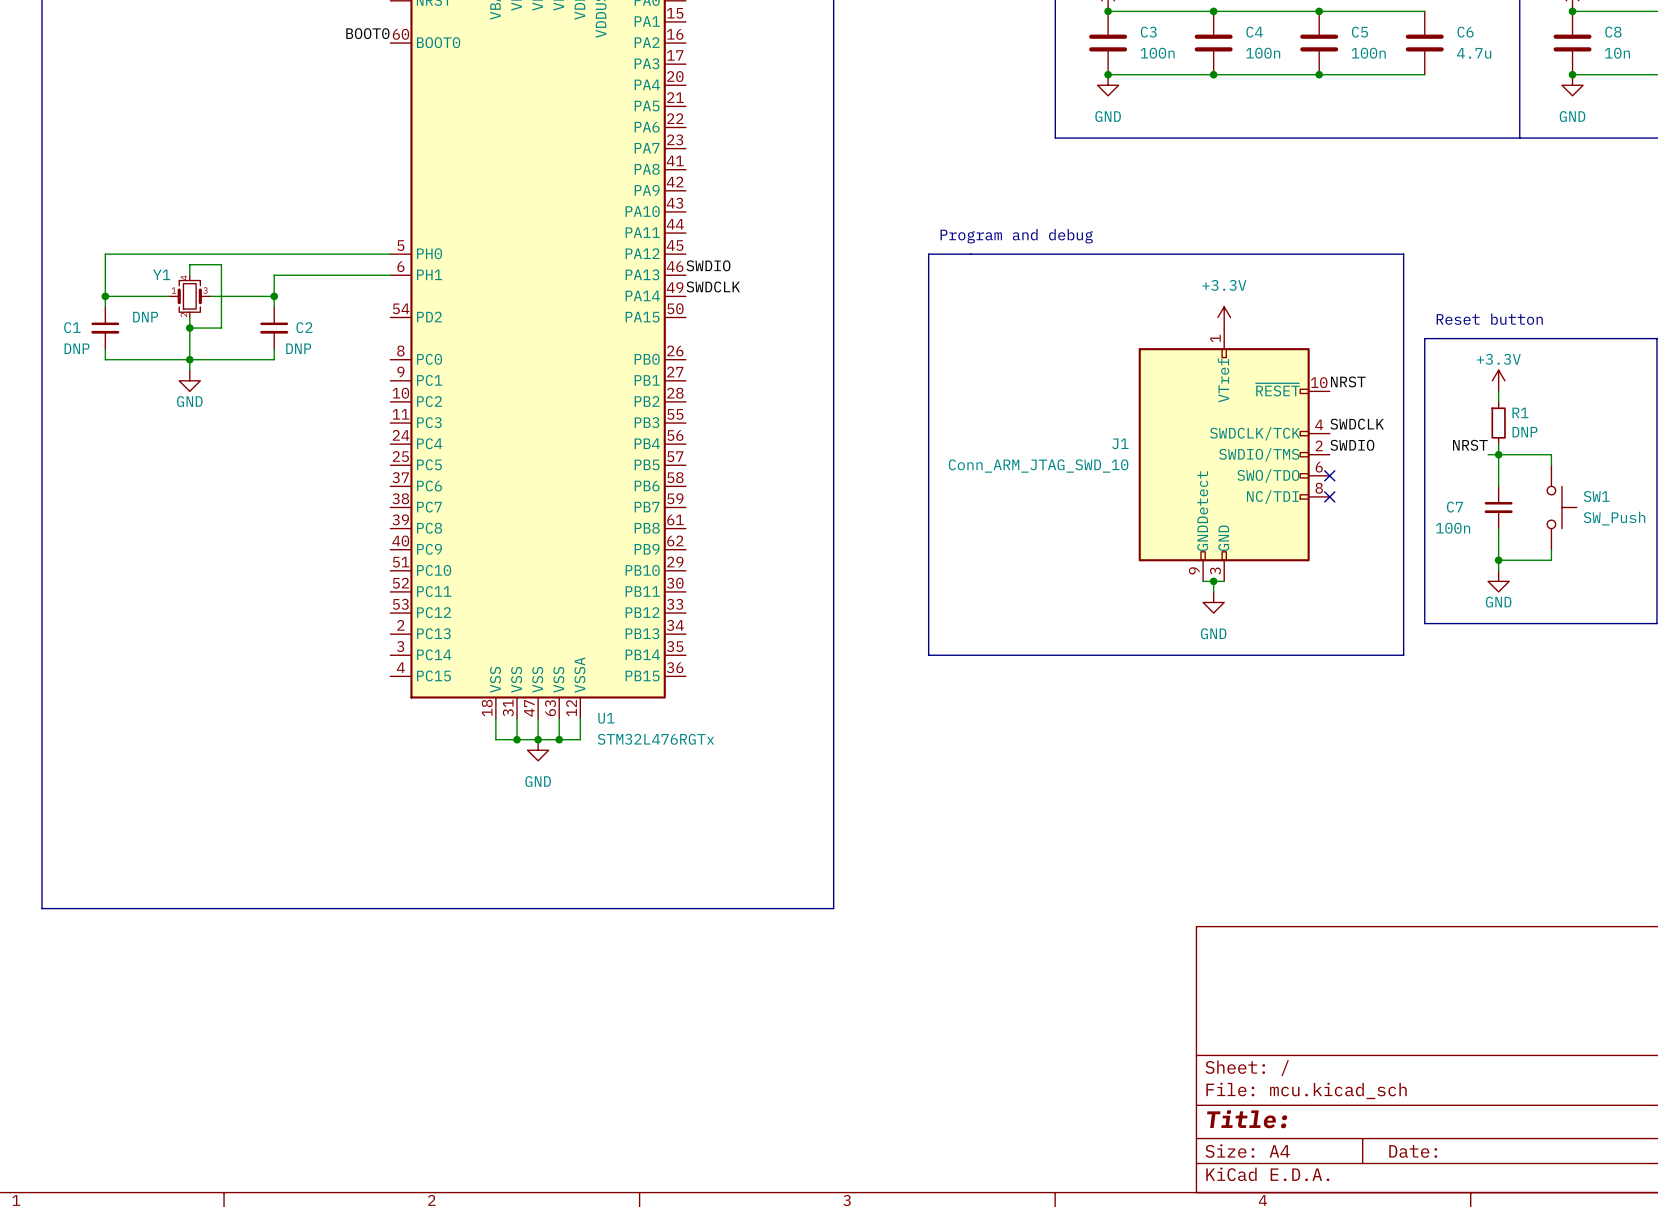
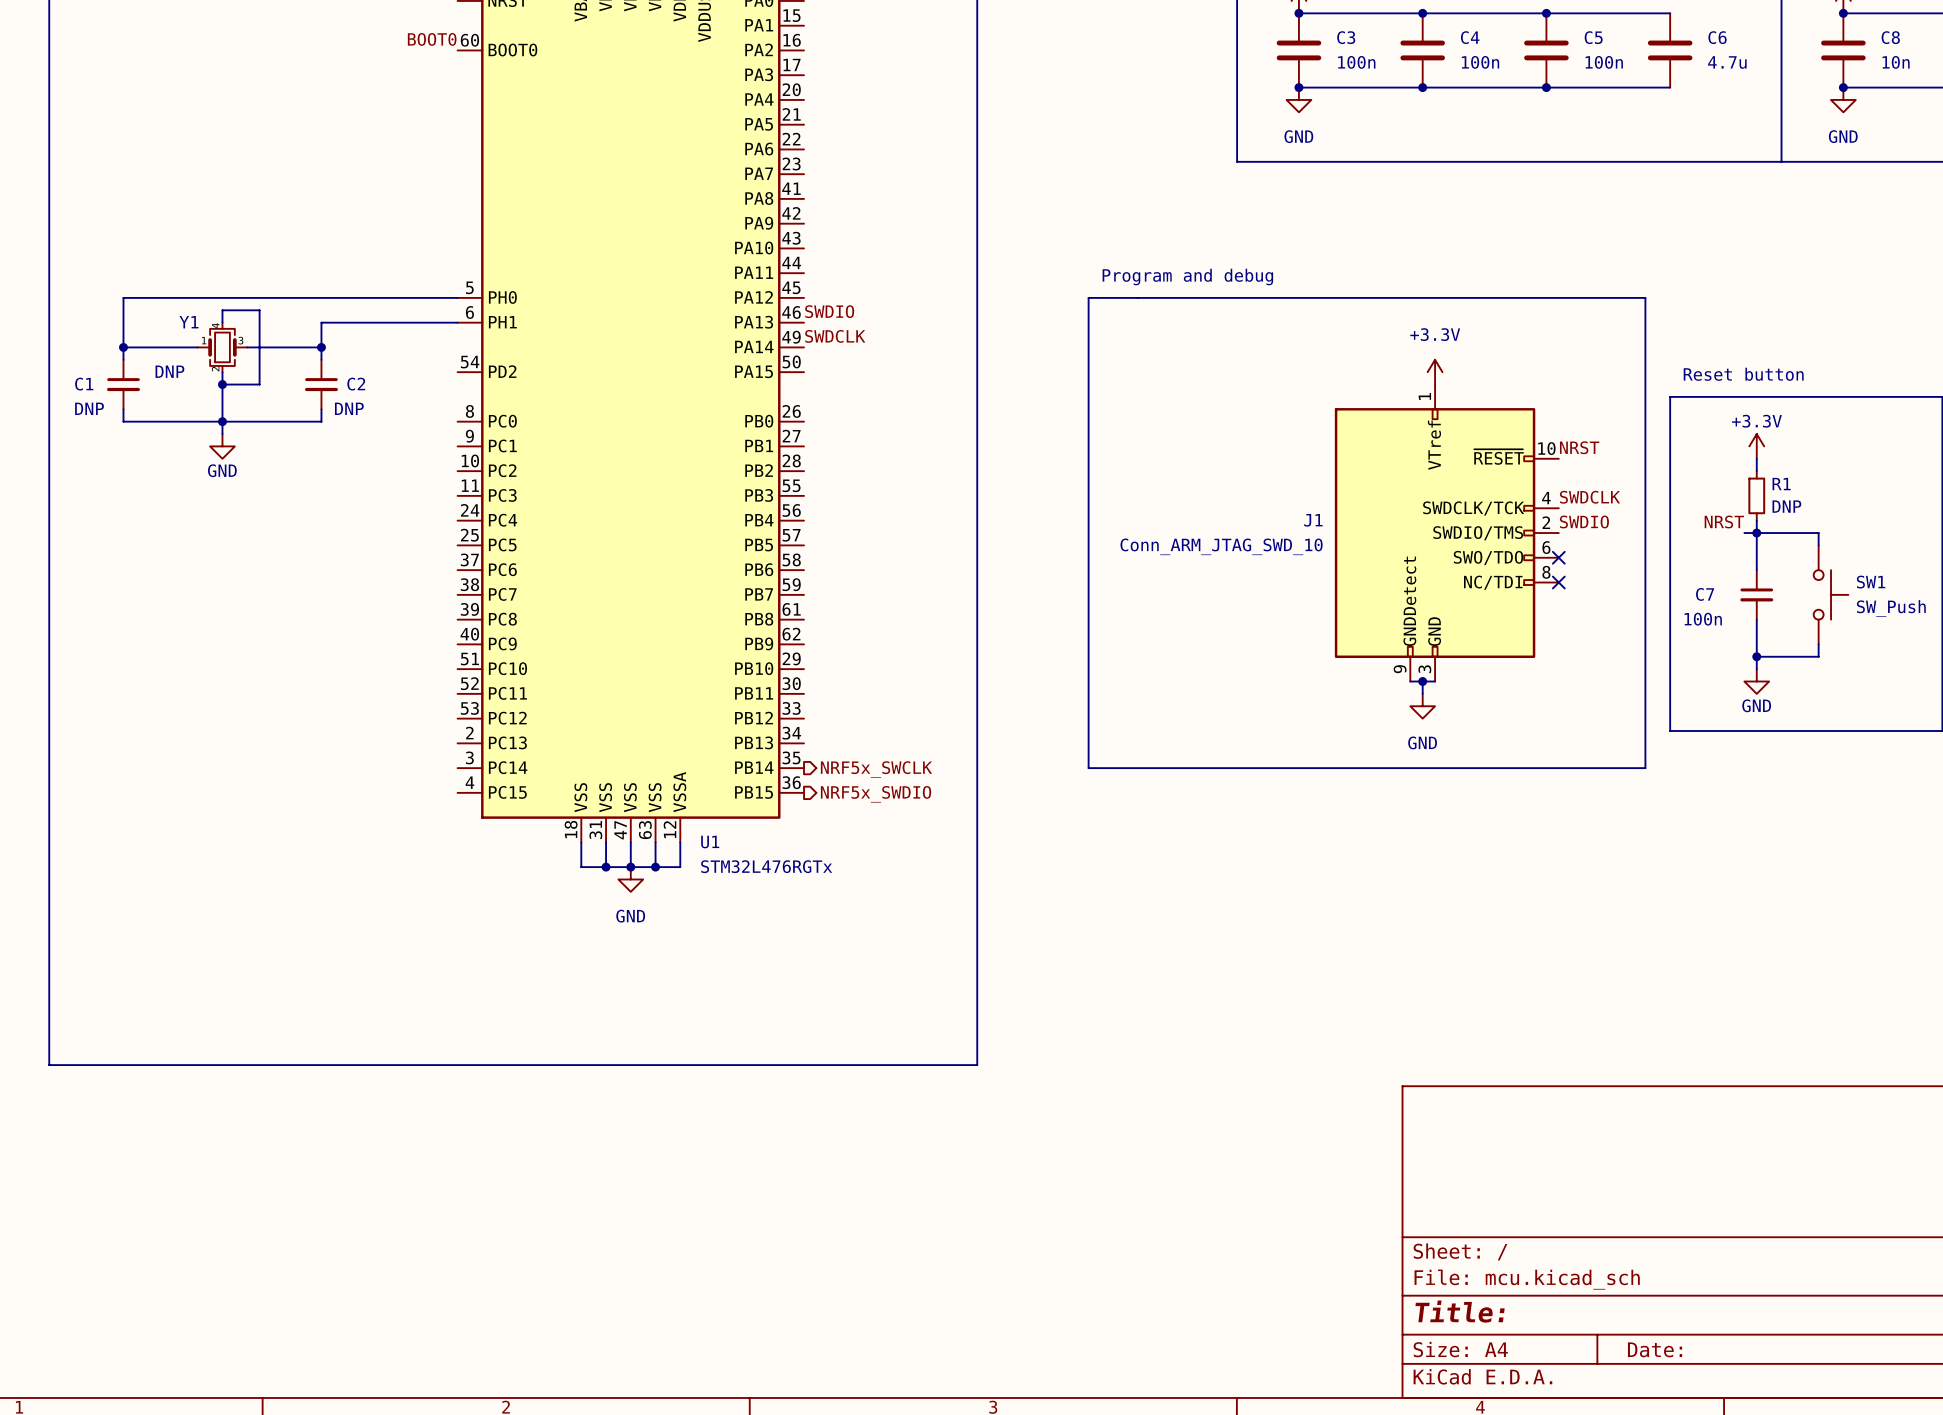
hierarchical label: none -> NRF5x_SWCLK (876, 769)
hierarchical label: none -> NRF5x_SWDIO (876, 794)

